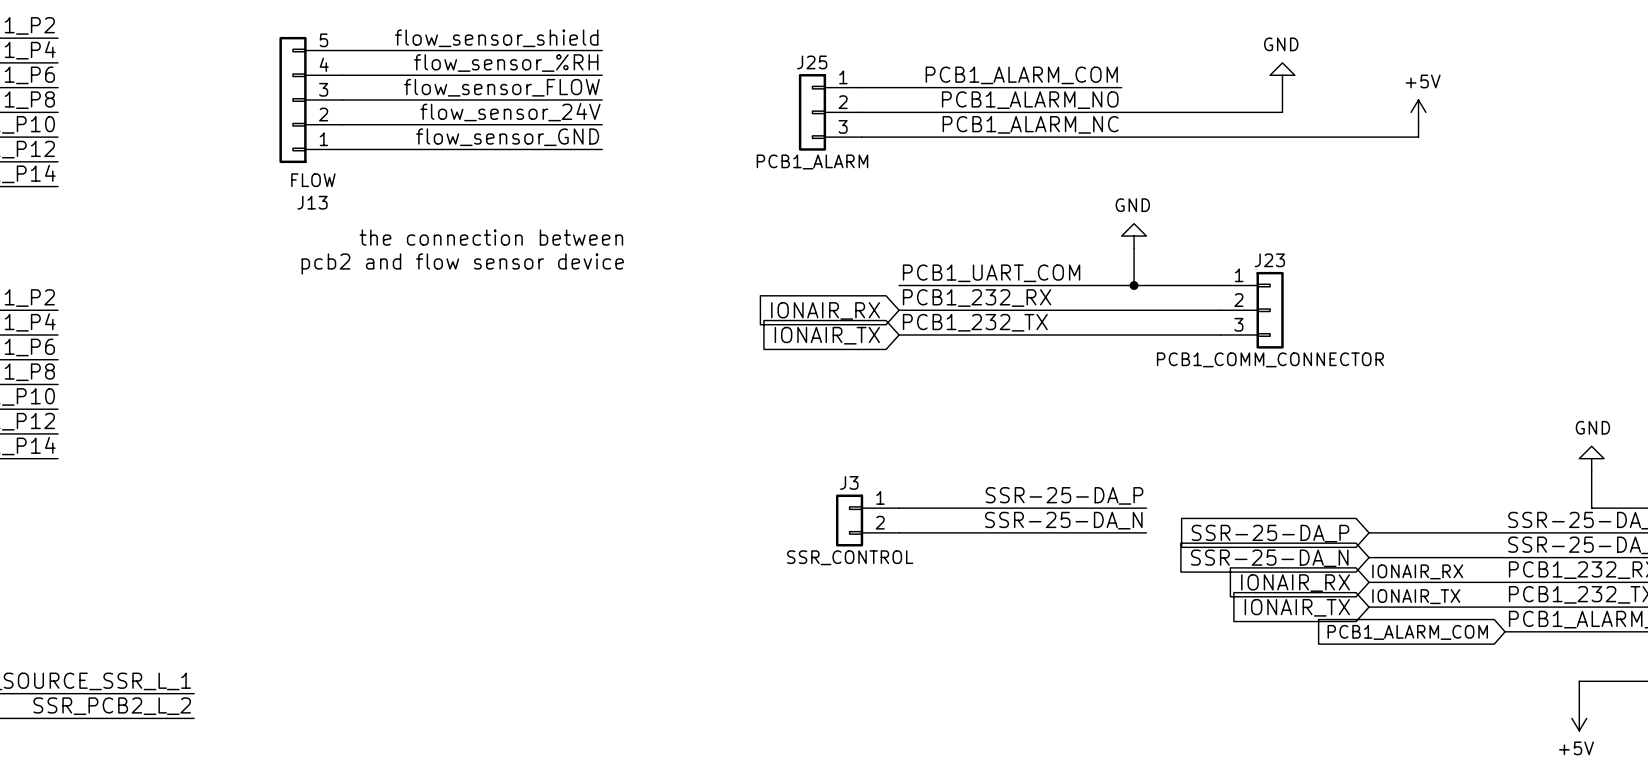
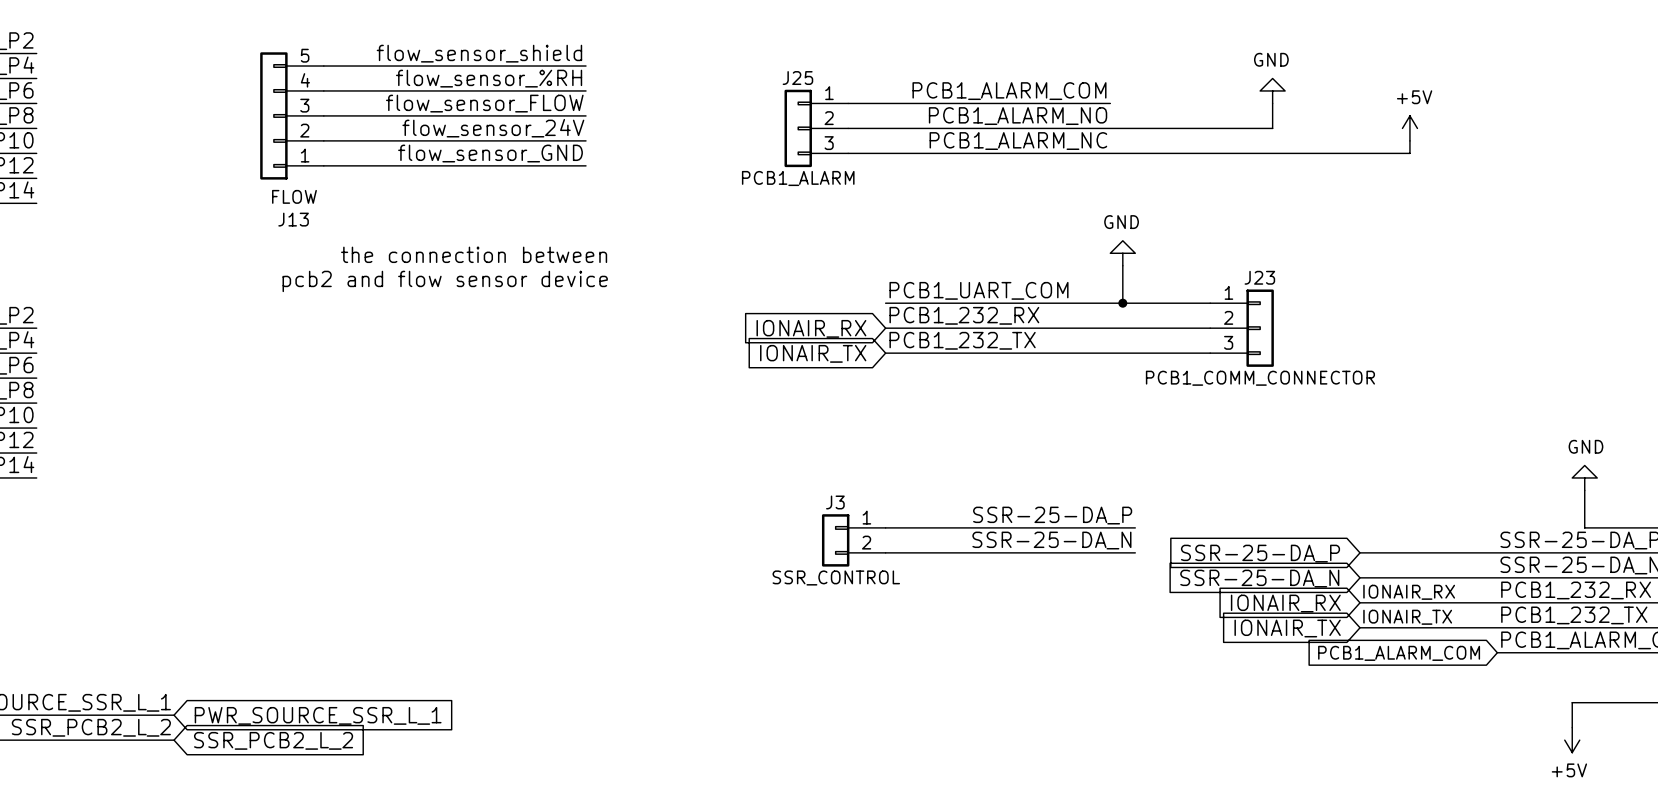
global label: none -> PWR_SOURCE_SSR_L_1 (318, 715)
global label: none -> SSR_PCB2_L_2 (273, 740)

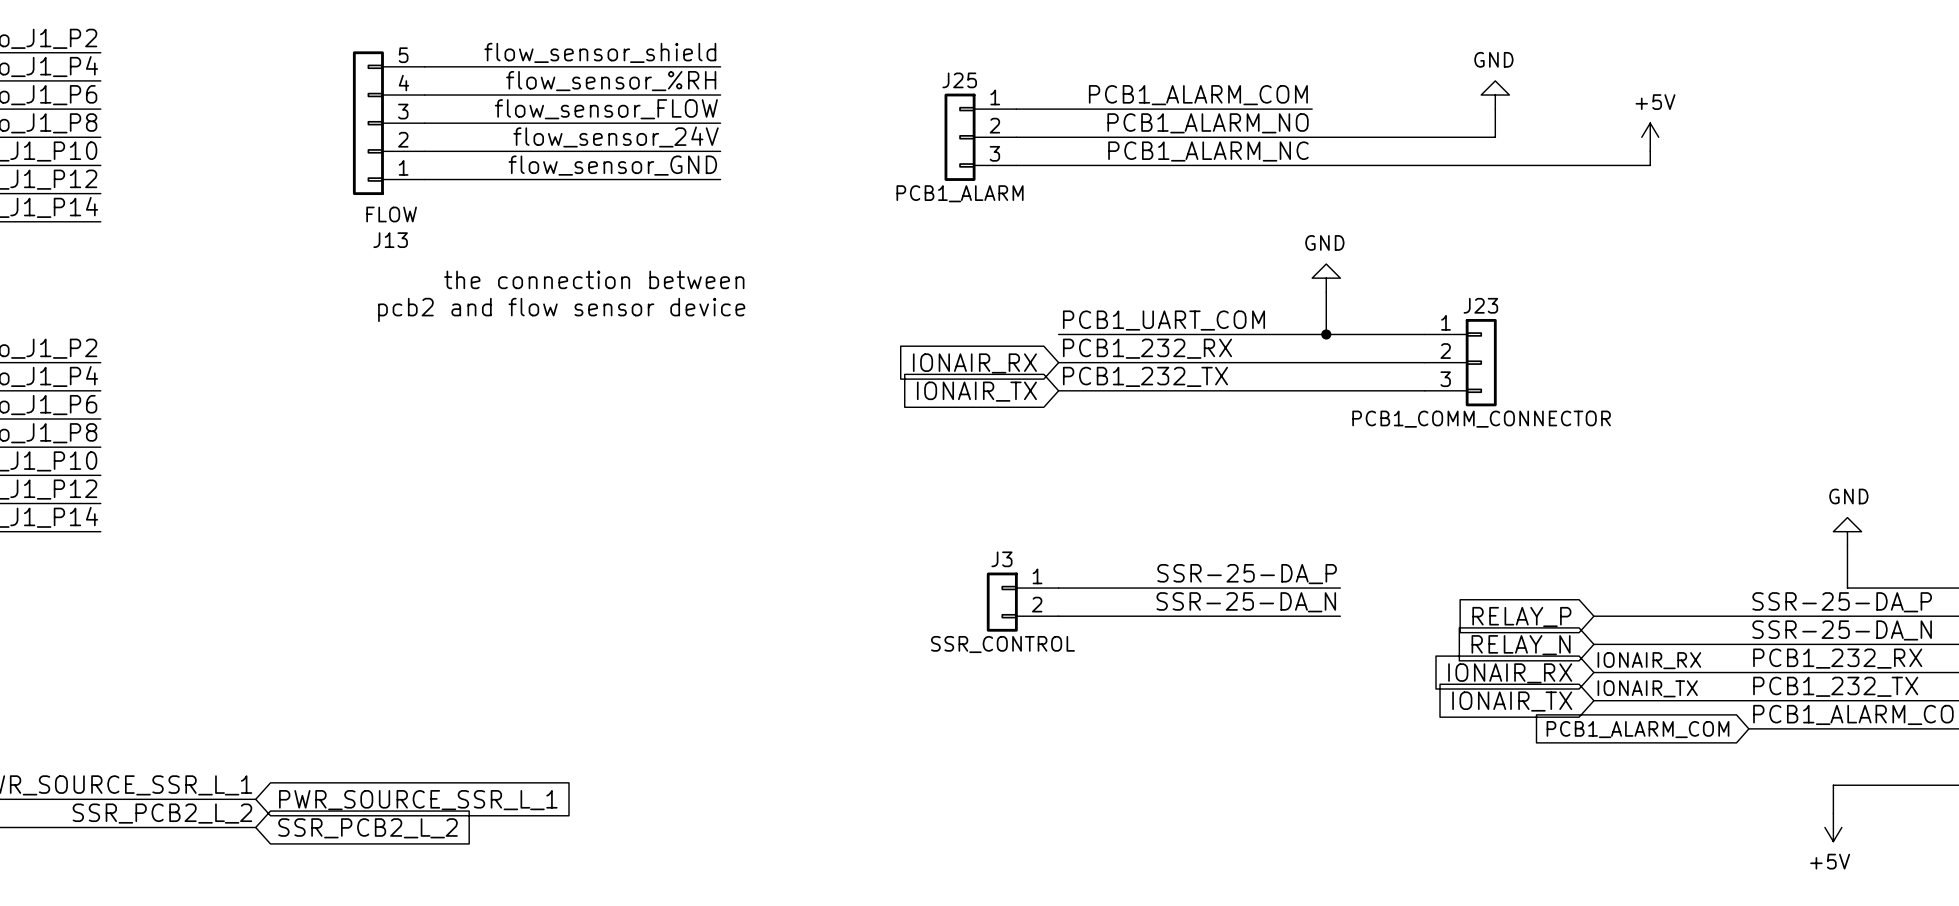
global label: SSR-25-DA_P (1260, 553) -> RELAY_P (1521, 617)
global label: SSR-25-DA_N (1259, 578) -> RELAY_N (1521, 645)

